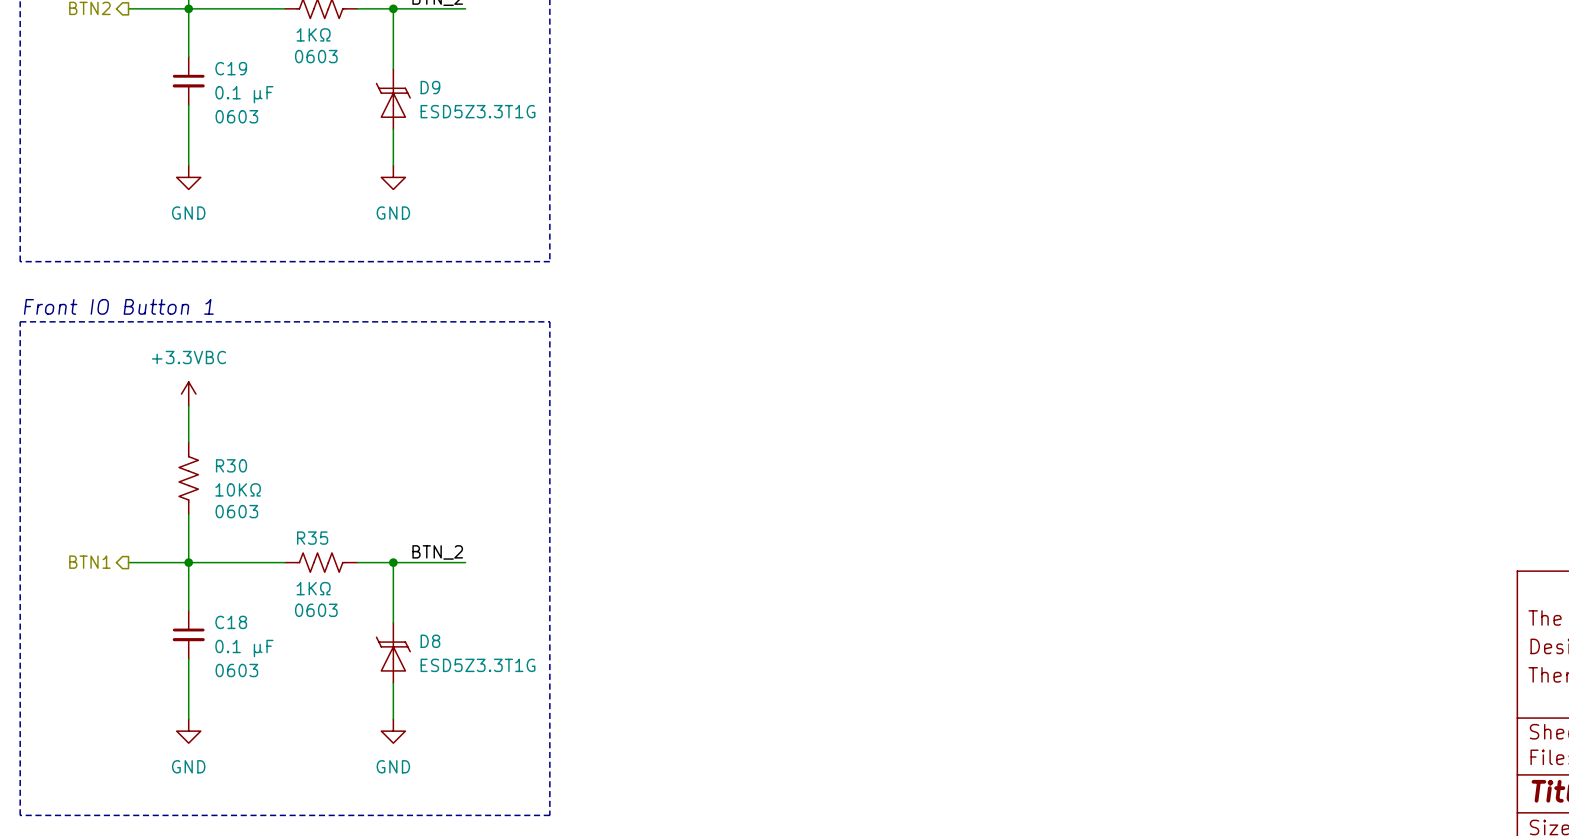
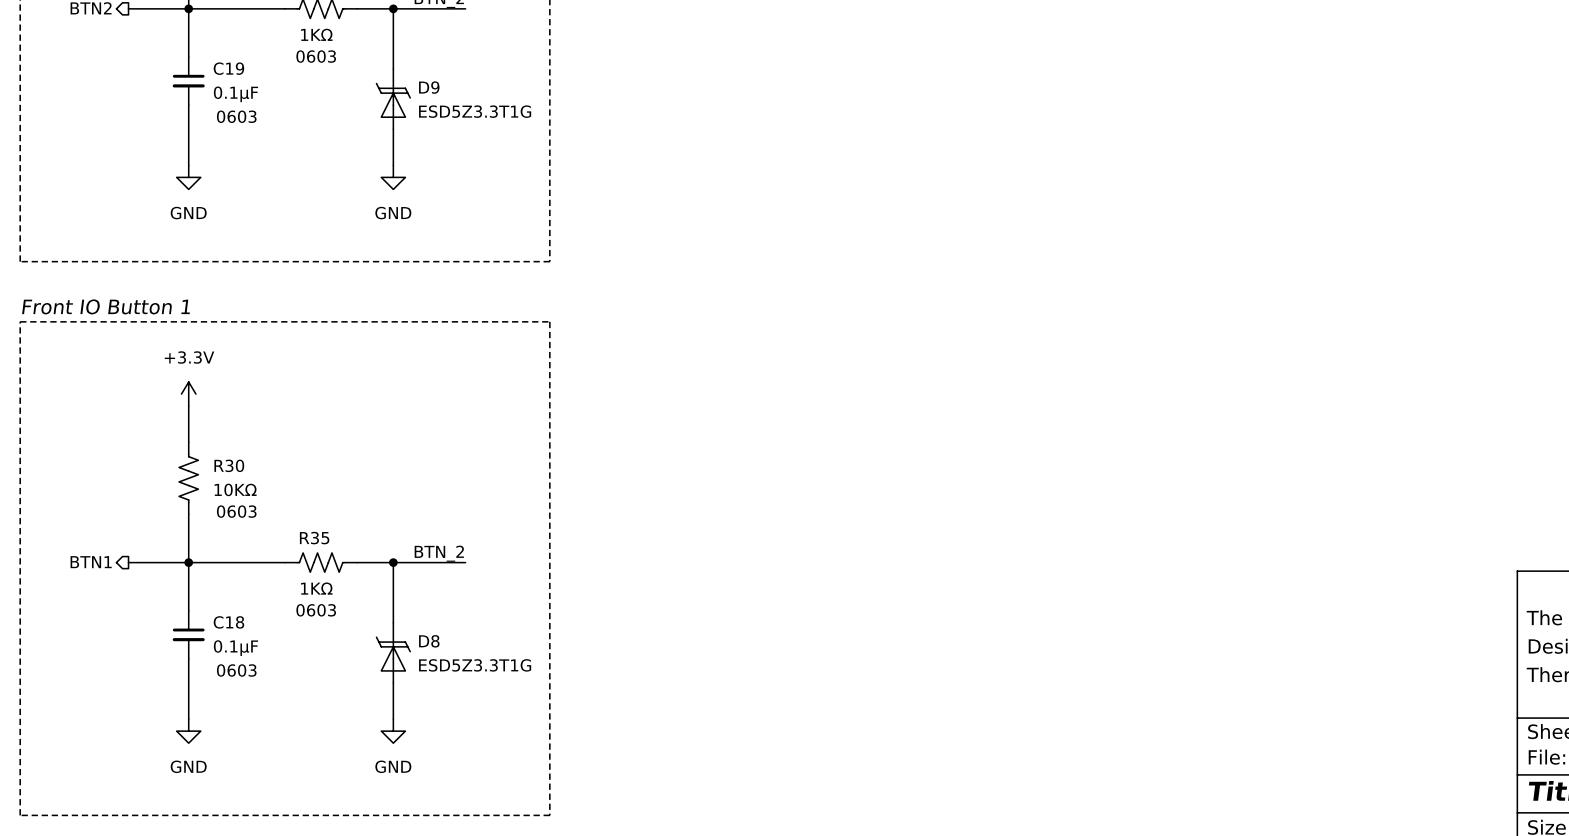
C19 value: 0.1 µF (244, 94) -> 0.1µF (235, 94)
power symbol: +3.3VBC (188, 394) -> +3.3V (188, 394)
C18 value: 0.1 µF (244, 648) -> 0.1µF (235, 648)

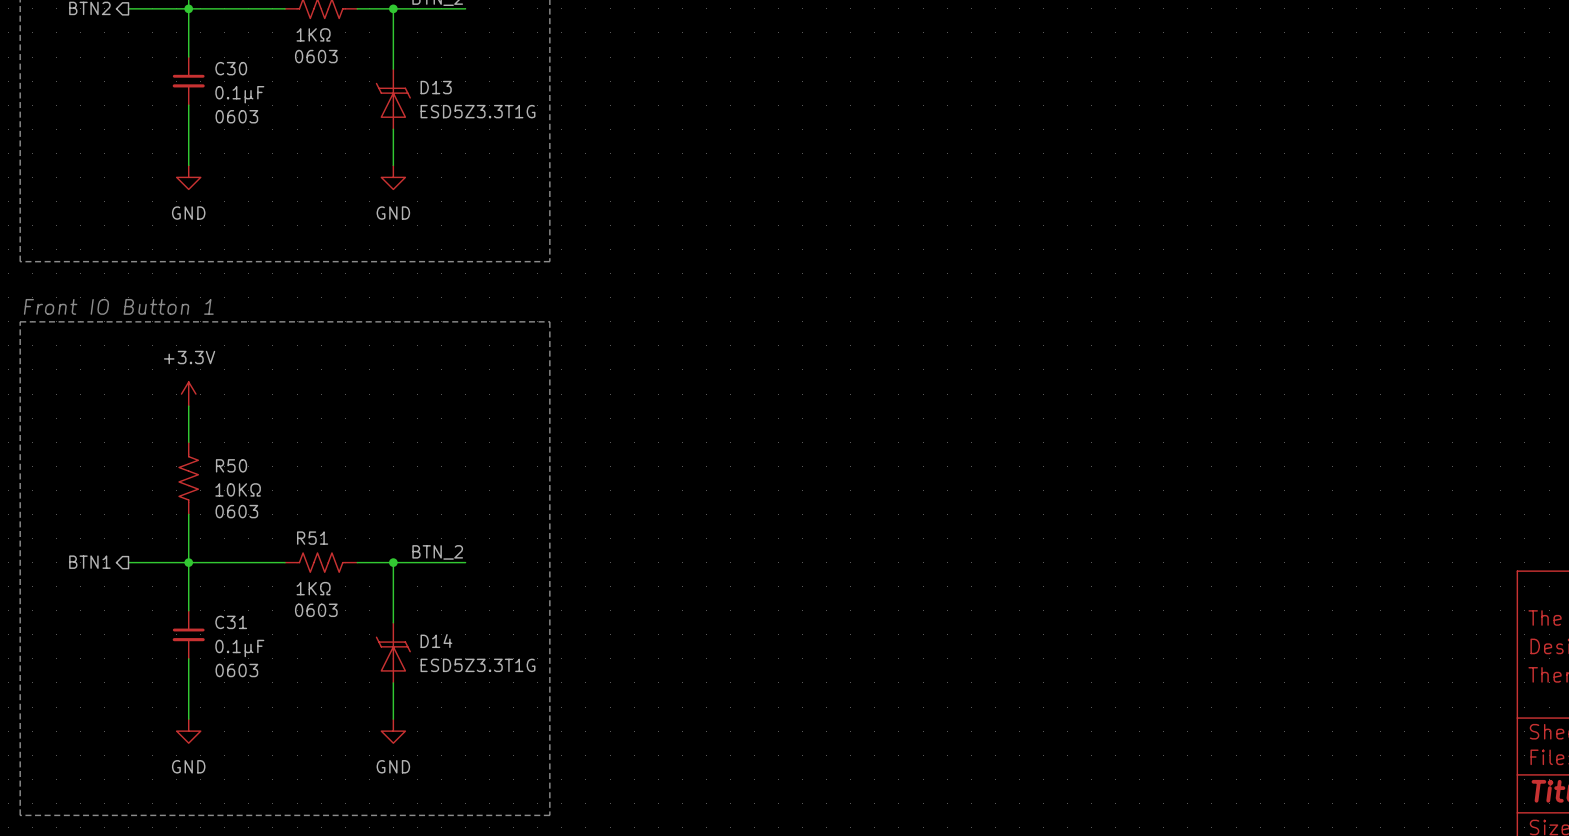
C19 name: C19 (228, 68) -> C30 (231, 68)
D9 name: D9 (429, 87) -> D13 (436, 87)
R30 name: R30 (229, 465) -> R50 (231, 465)
R35 name: R35 (314, 538) -> R51 (312, 538)
C18 name: C18 (228, 622) -> C31 (231, 622)
D8 name: D8 (429, 641) -> D14 (436, 641)

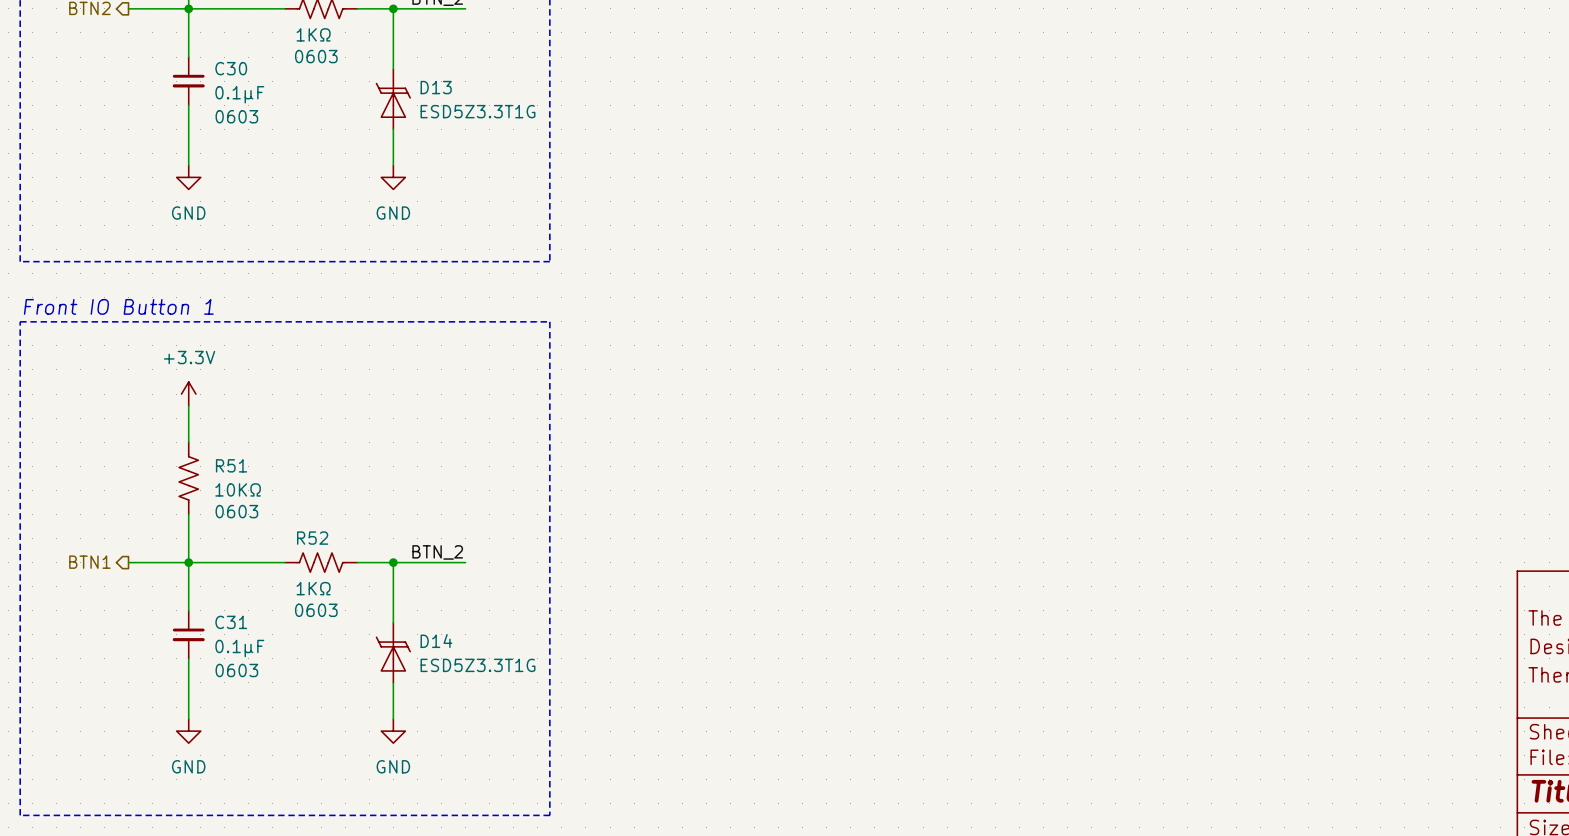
R50 name: R50 (231, 465) -> R51 (231, 465)
R51 name: R51 (312, 538) -> R52 (312, 538)

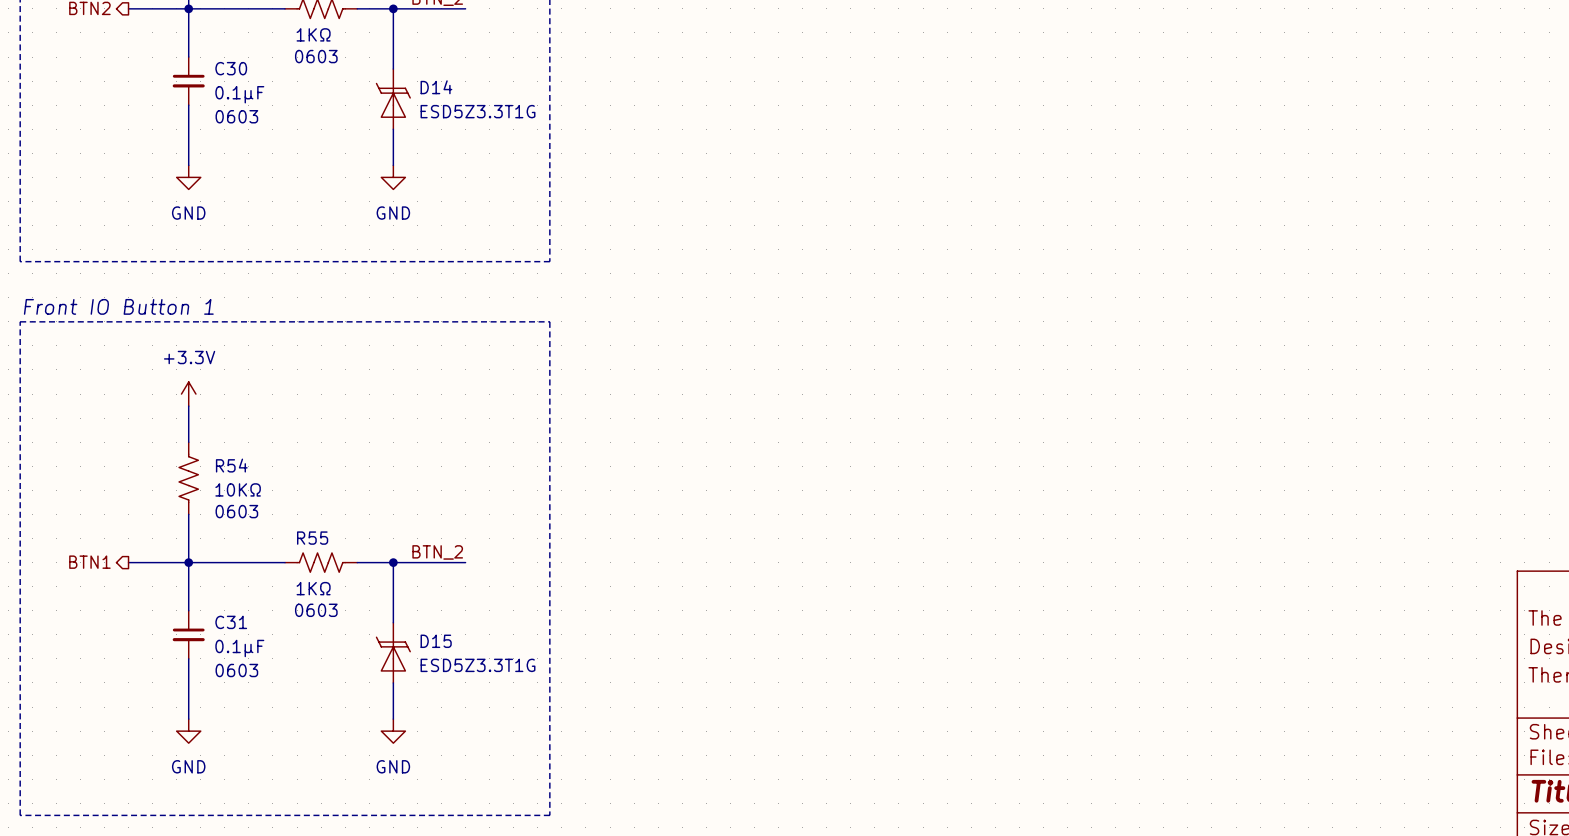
D13 name: D13 (436, 87) -> D14 (436, 87)
R51 name: R51 (231, 465) -> R54 (231, 465)
R52 name: R52 (312, 538) -> R55 (312, 538)
D14 name: D14 (436, 641) -> D15 (436, 641)

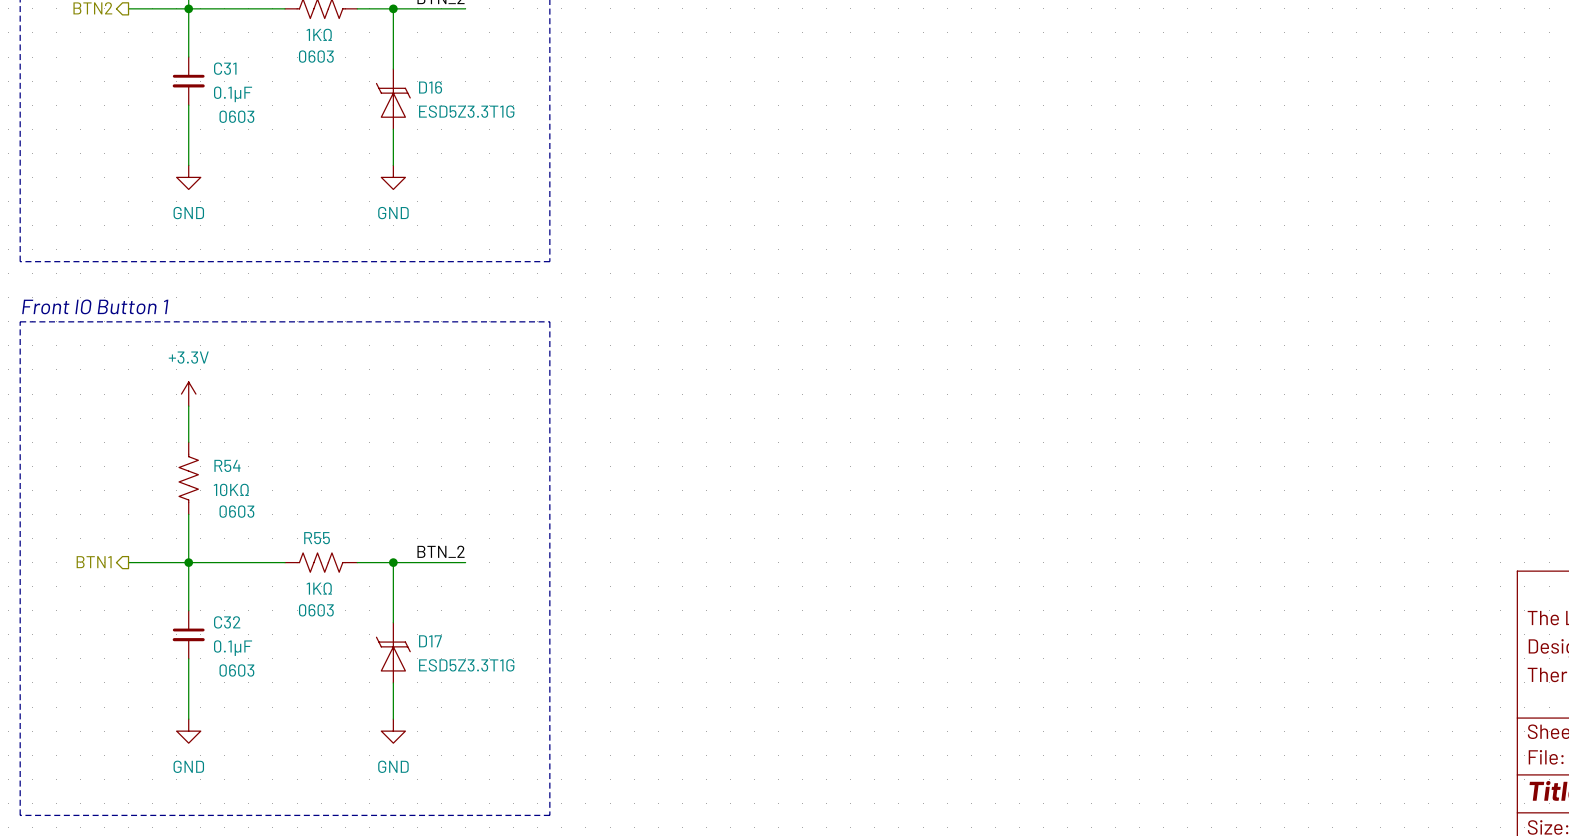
C30 name: C30 (231, 68) -> C31 (225, 68)
D14 name: D14 (436, 87) -> D16 (430, 87)
C31 name: C31 (231, 622) -> C32 (227, 622)
D15 name: D15 (436, 641) -> D17 (430, 641)

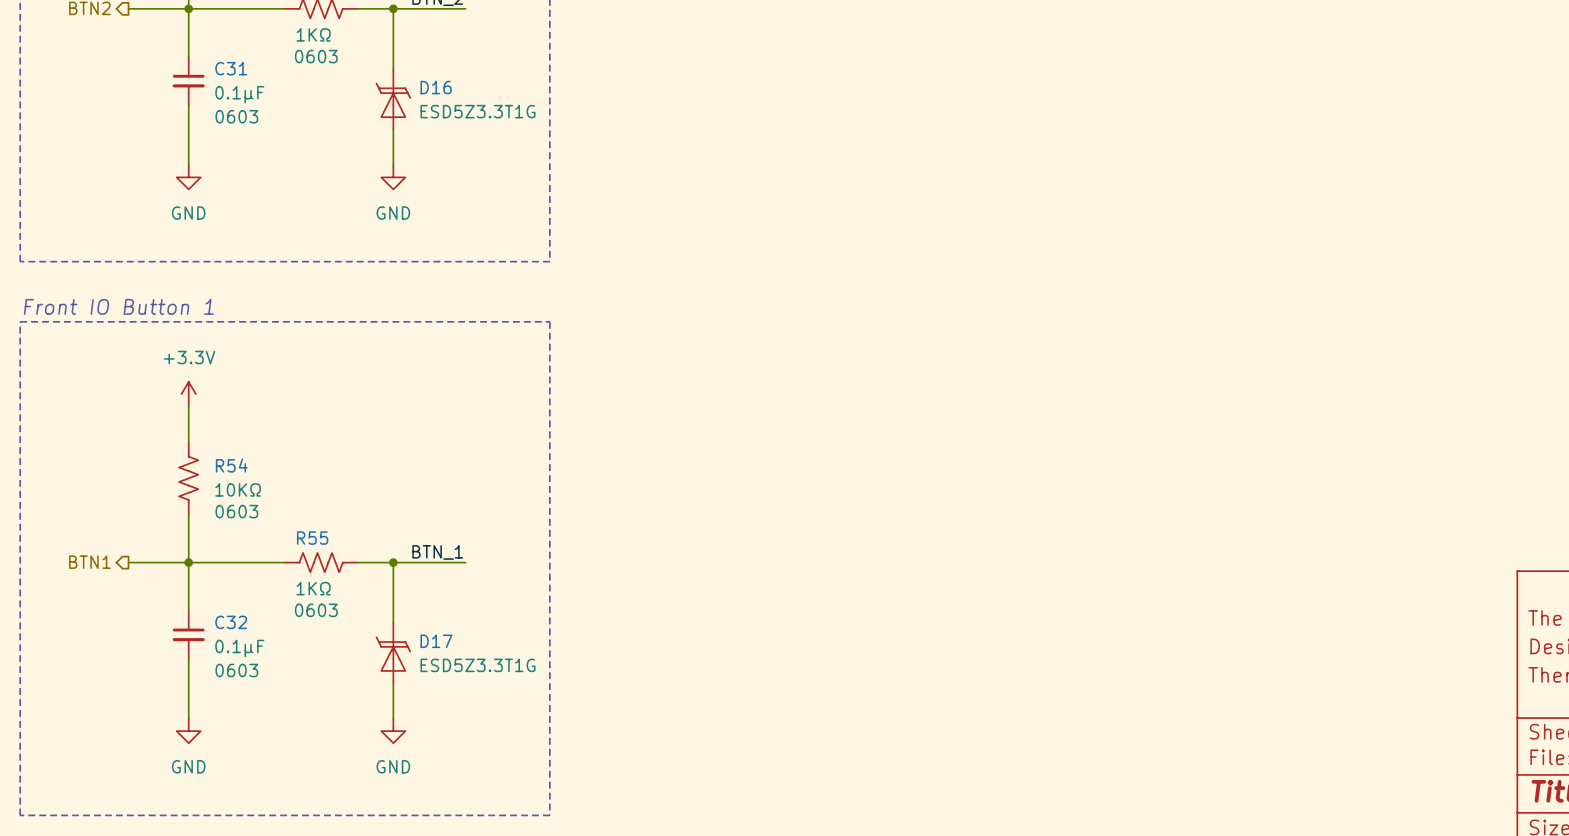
label: BTN_2 (441, 551) -> BTN_1 (437, 552)

